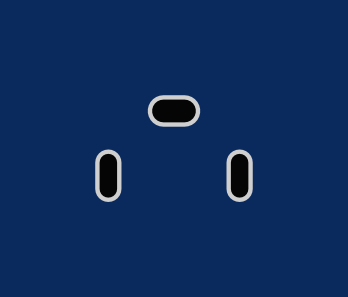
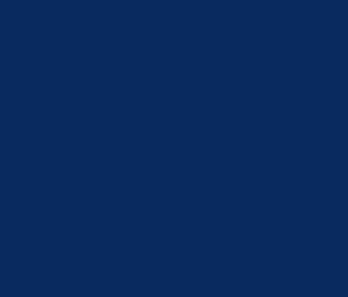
part: (173, 148) -> none

